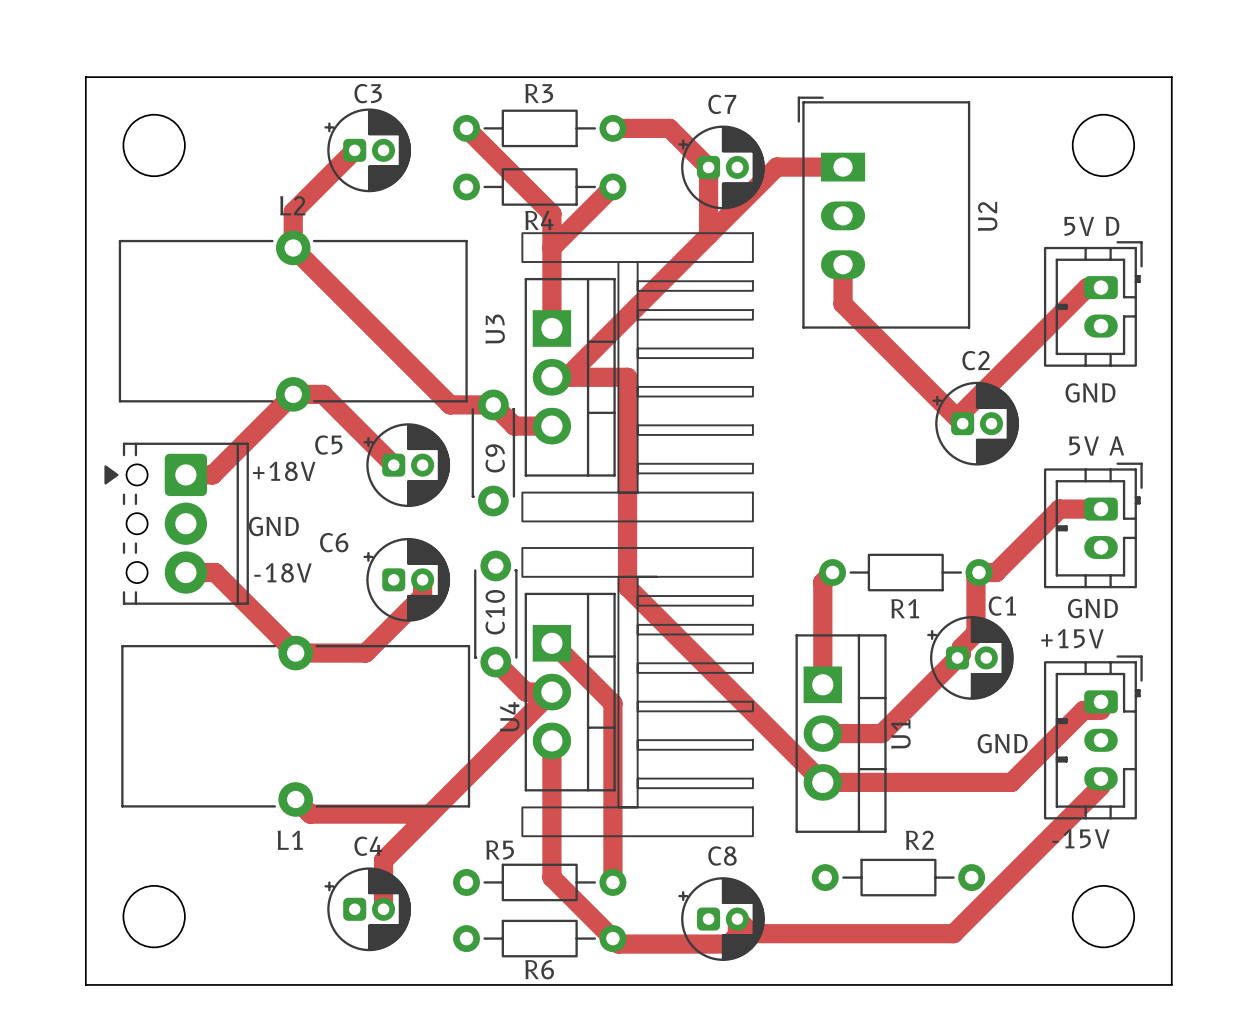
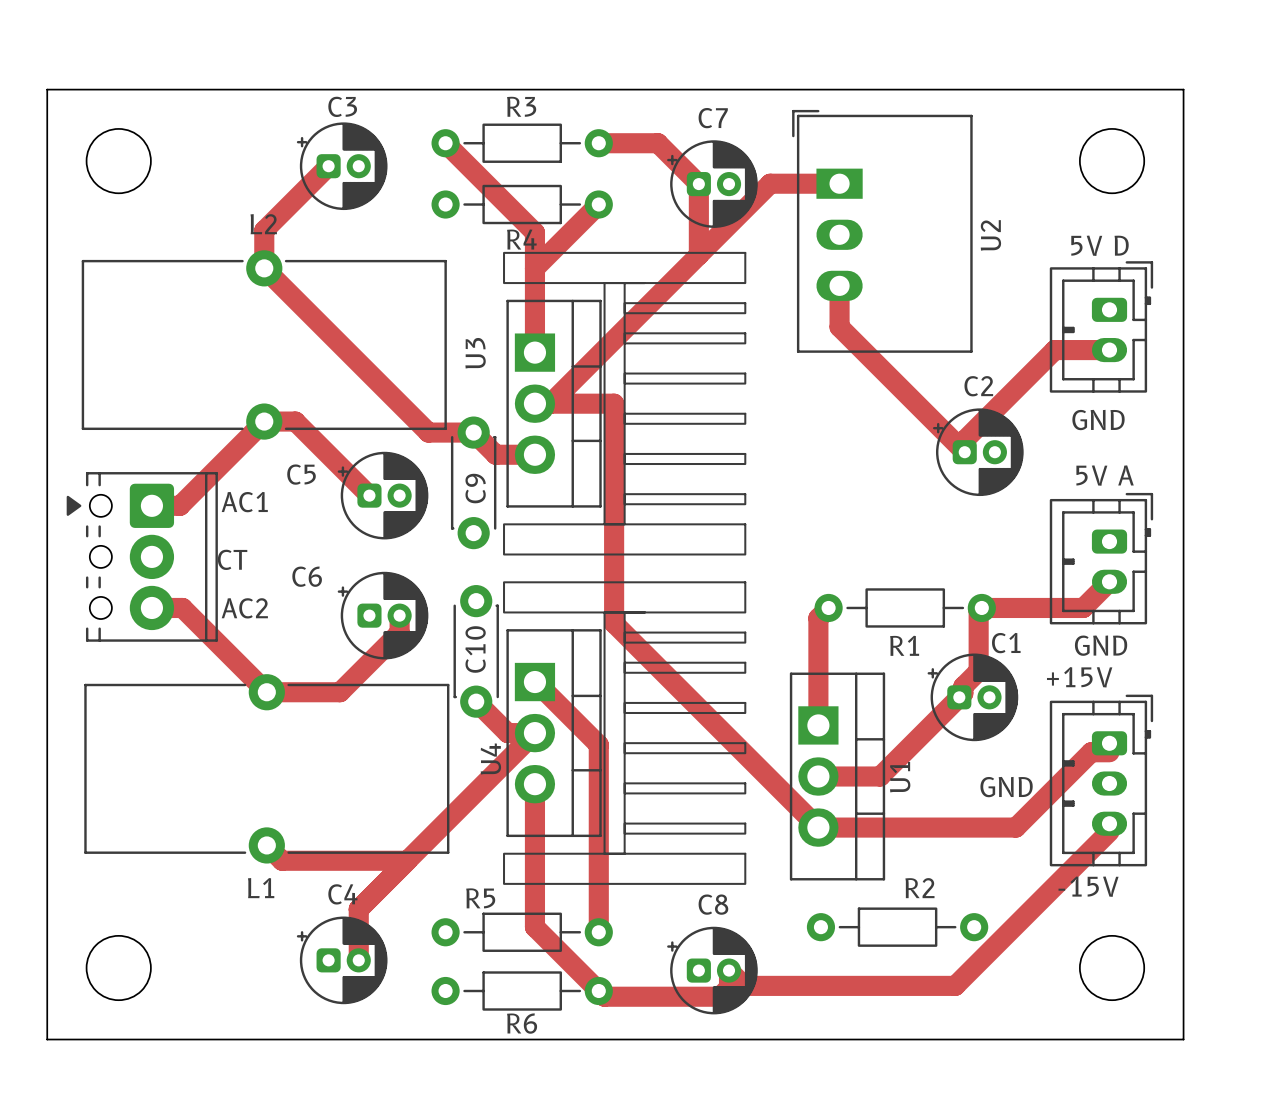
track: (1101, 287) (1087, 287) (1048, 326) -> (1109, 350) (1054, 350)
text: +18V (284, 471) -> AC1 (244, 502)
track: (1101, 509) (1059, 509) (996, 572) -> (1109, 581) (1083, 607) (999, 607)
text: GND (273, 526) -> CT (232, 559)
text: -18V (282, 572) -> AC2 (244, 608)

